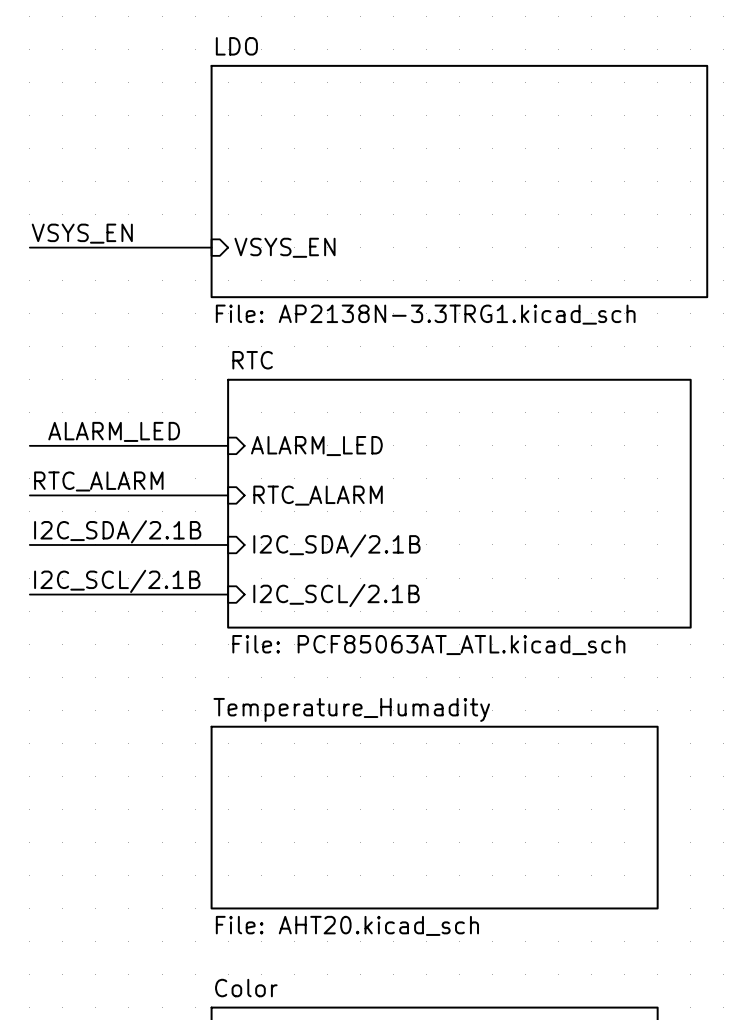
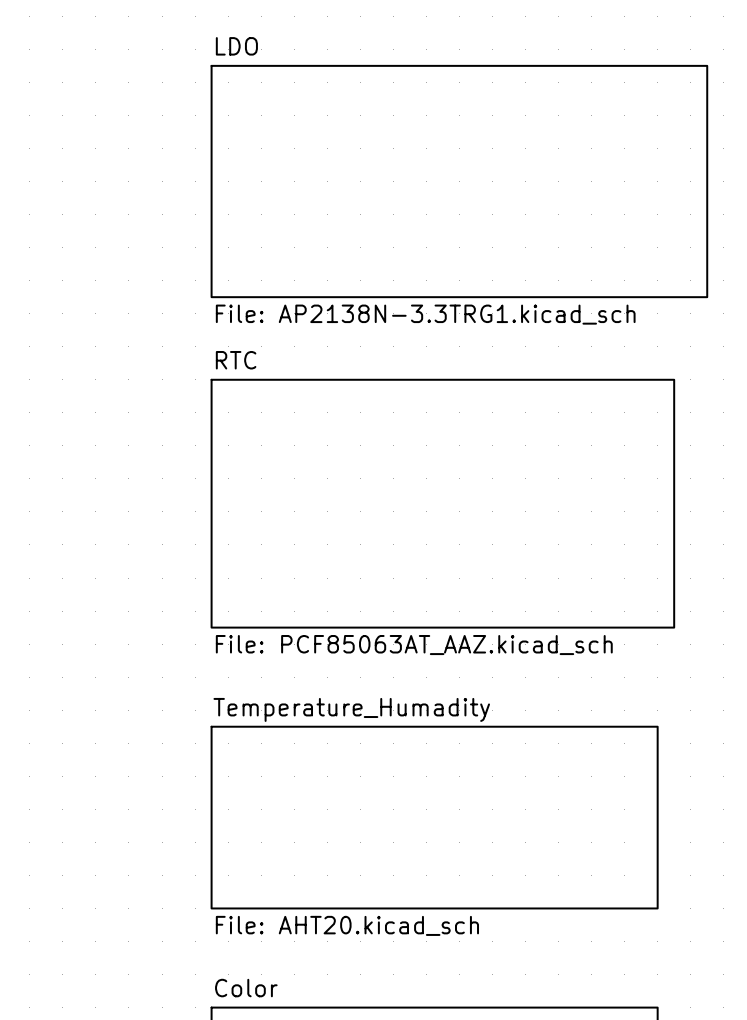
label: VSYS_EN (82, 233) -> none
wire: (29, 247) (211, 247) -> none
sheet pin: VSYS_EN (285, 247) -> none
label: ALARM_LED (114, 431) -> none
wire: (29, 445) (228, 445) -> none
sheet pin: ALARM_LED (316, 446) -> none
label: RTC_ALARM (98, 481) -> none
wire: (29, 495) (228, 495) -> none
sheet pin: RTC_ALARM (318, 495) -> none
sheet RTC: none -> File: PCF85063AT_AAZ.kicad_sch (442, 503)
sheet RTC: File: PCF85063AT_ATL.kicad_sch (459, 503) -> none
label: I2C_SDA/2.1B (117, 531) -> none
wire: (29, 544) (228, 544) -> none
sheet pin: I2C_SDA/2.1B (336, 545) -> none
label: I2C_SCL/2.1B (117, 581) -> none
wire: (29, 594) (228, 594) -> none
sheet pin: I2C_SCL/2.1B (336, 595) -> none

